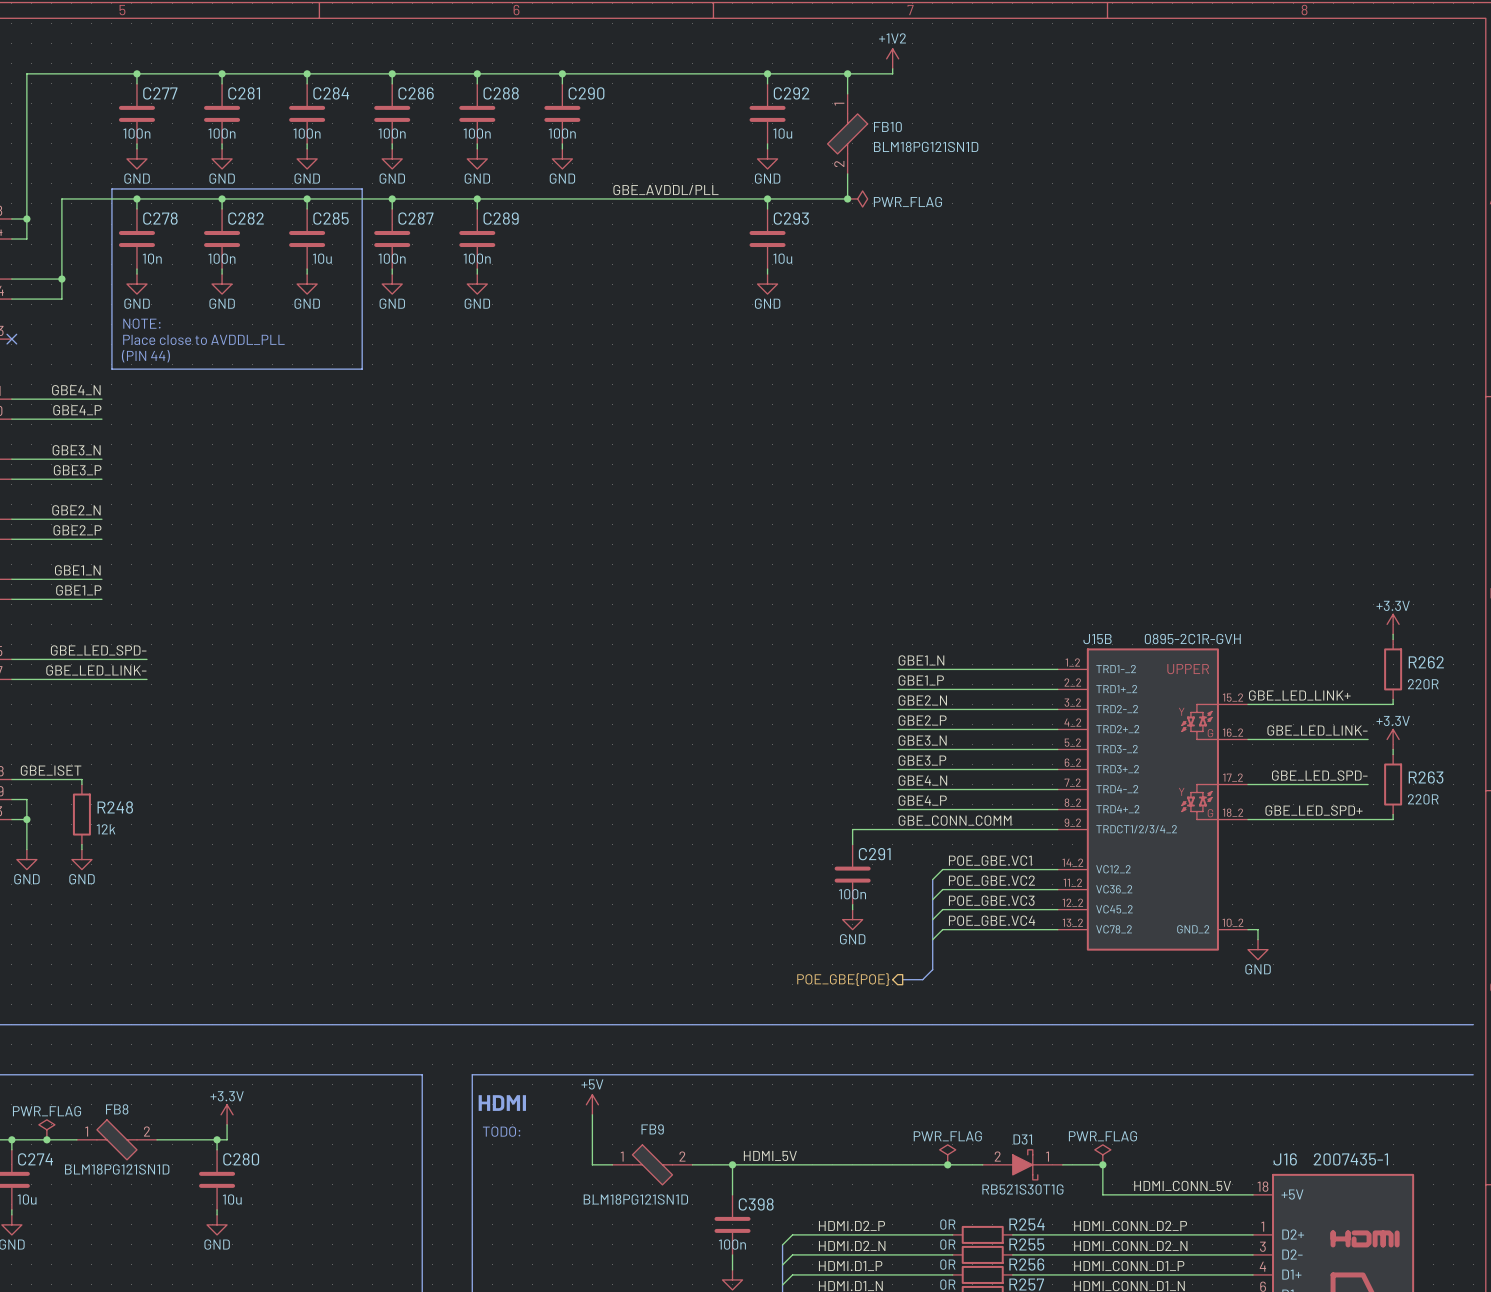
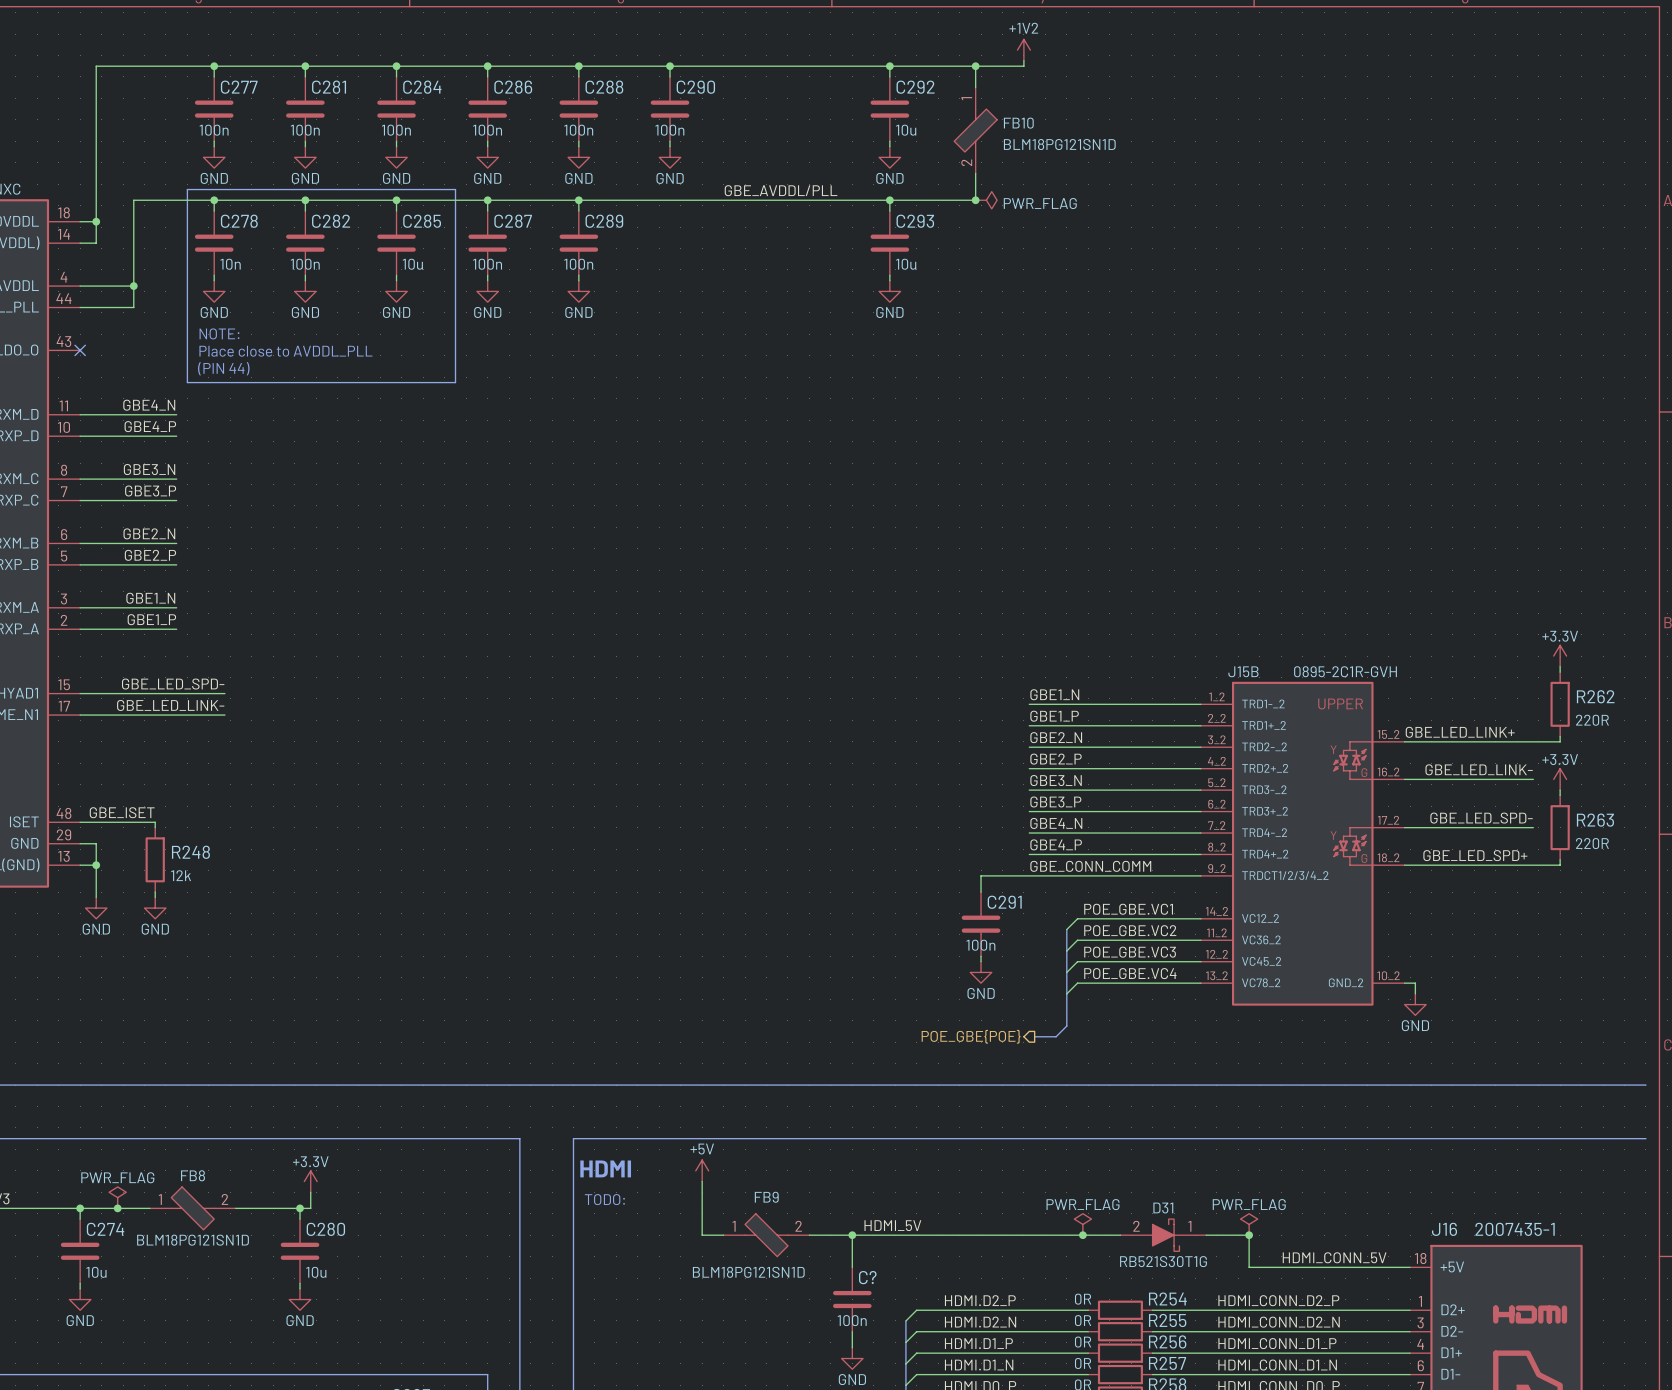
C398 name: C398 (756, 1204) -> C? (867, 1277)

